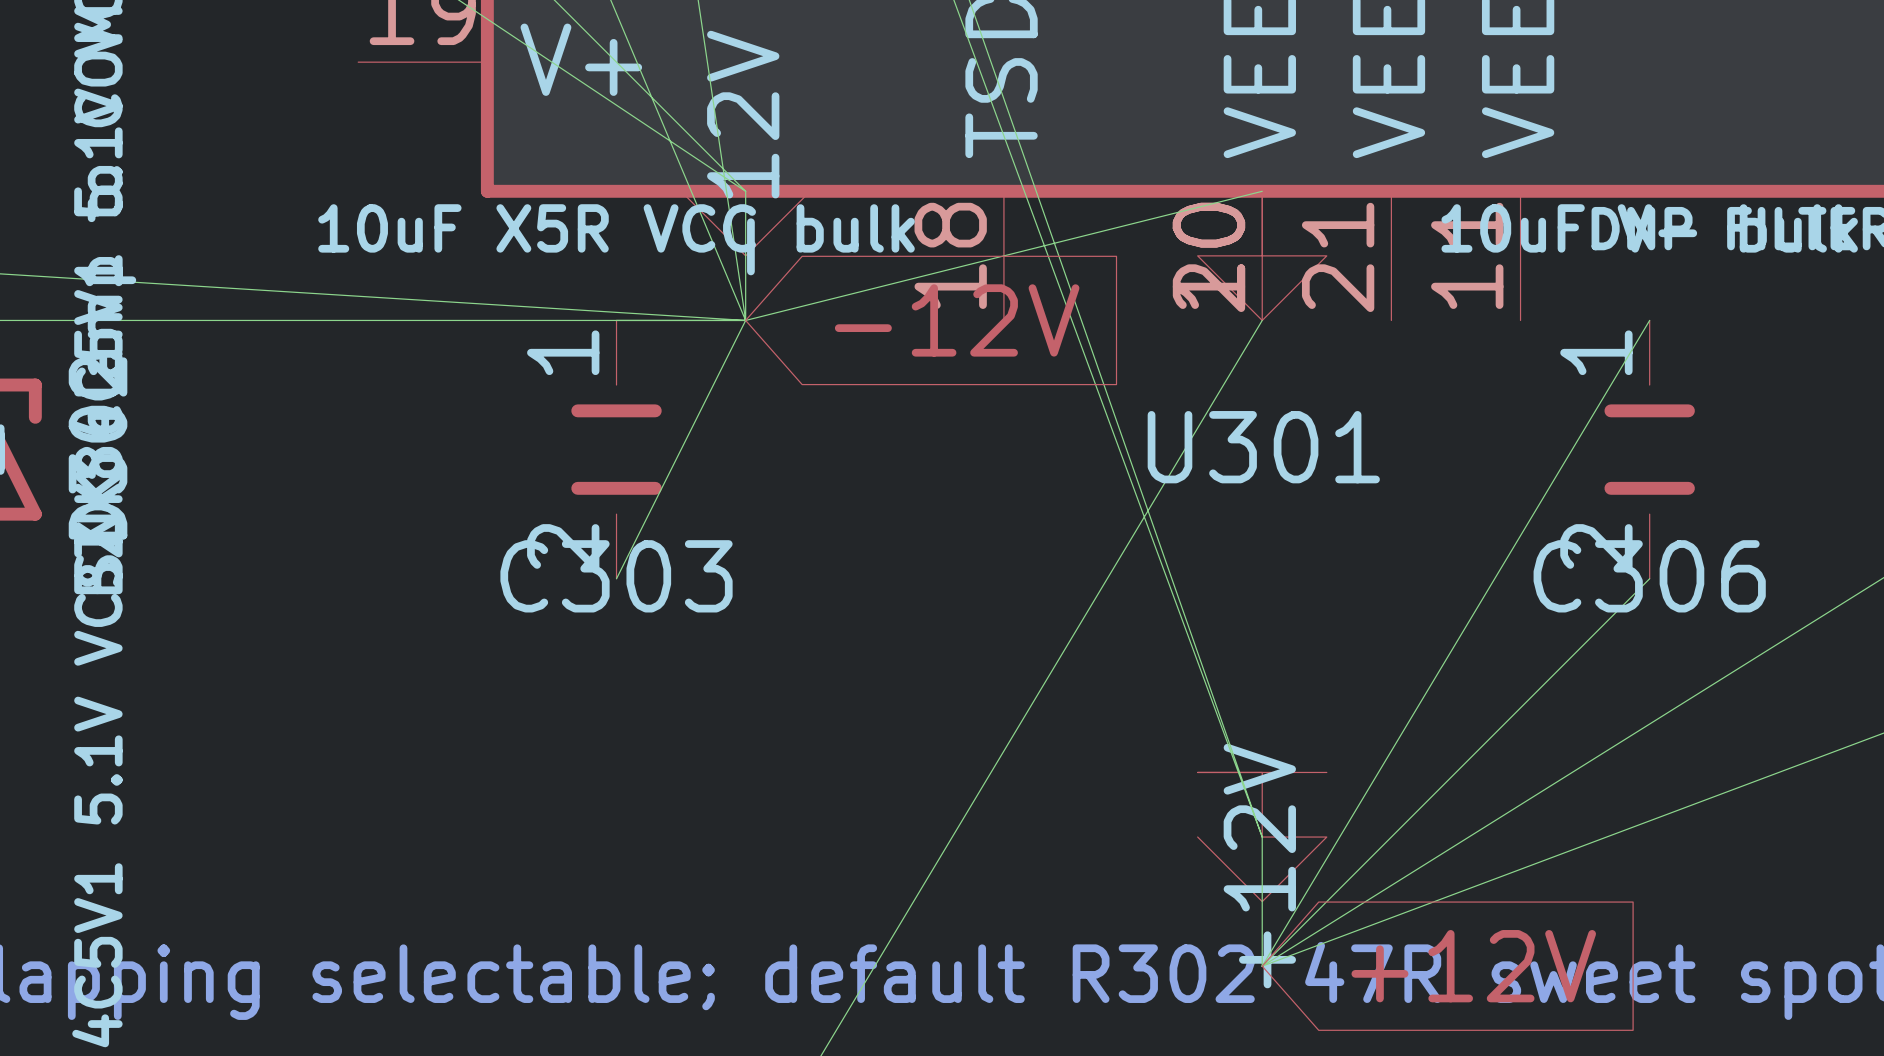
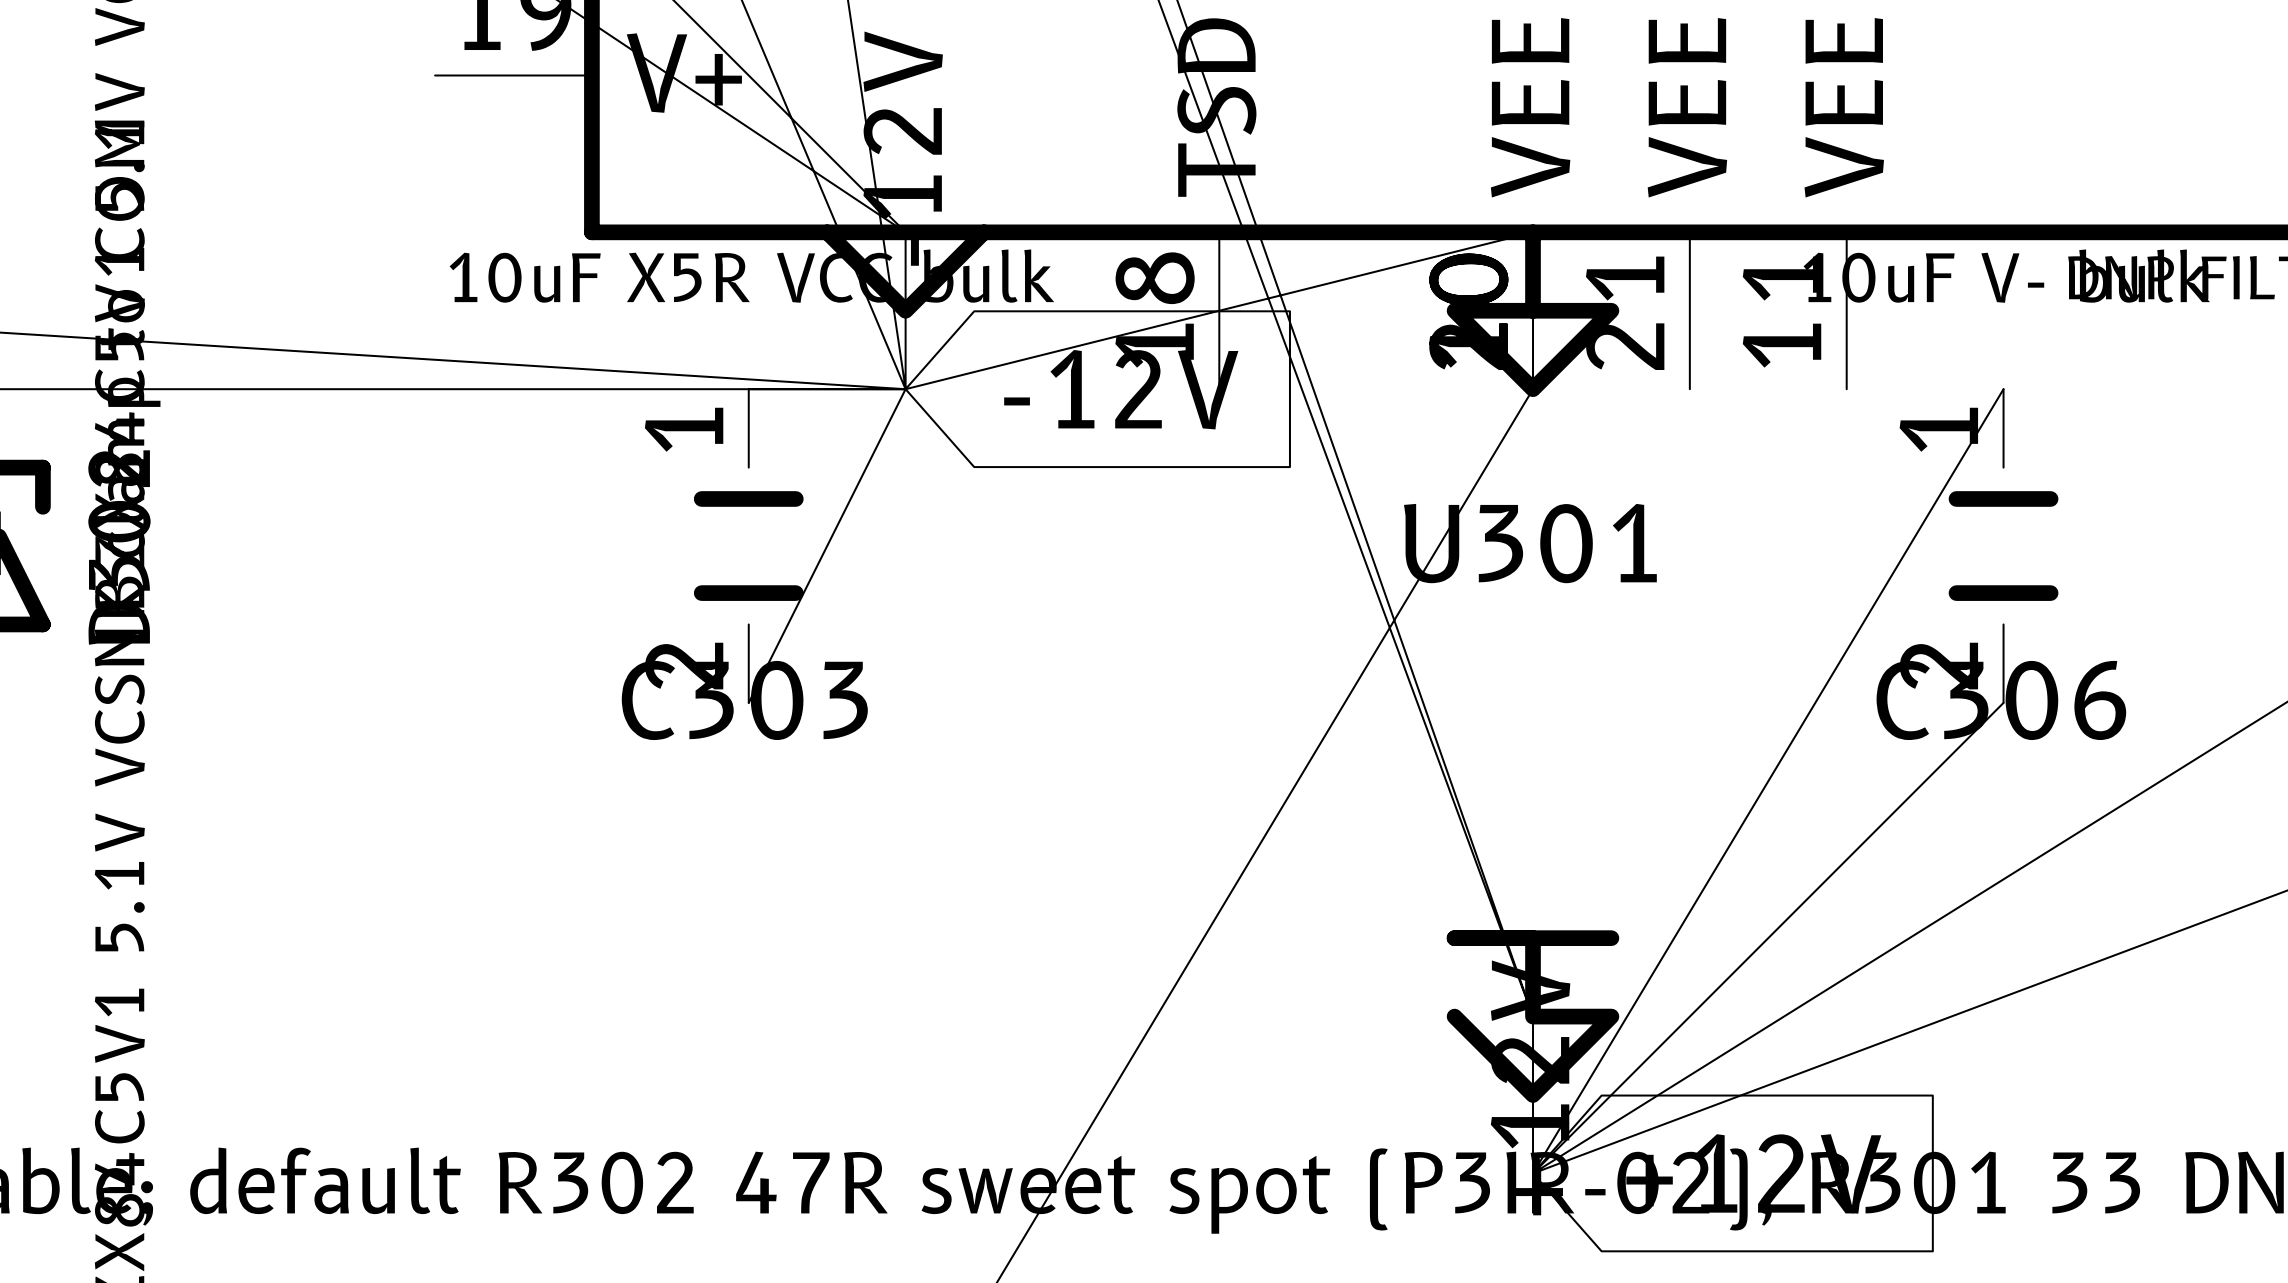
power symbol shape: [681, 191, 811, 256] -> [819, 224, 992, 319]
power symbol shape: [1197, 191, 1327, 321] -> [1446, 224, 1620, 398]
power symbol shape: [1197, 772, 1327, 902] -> [1446, 930, 1620, 1103]

